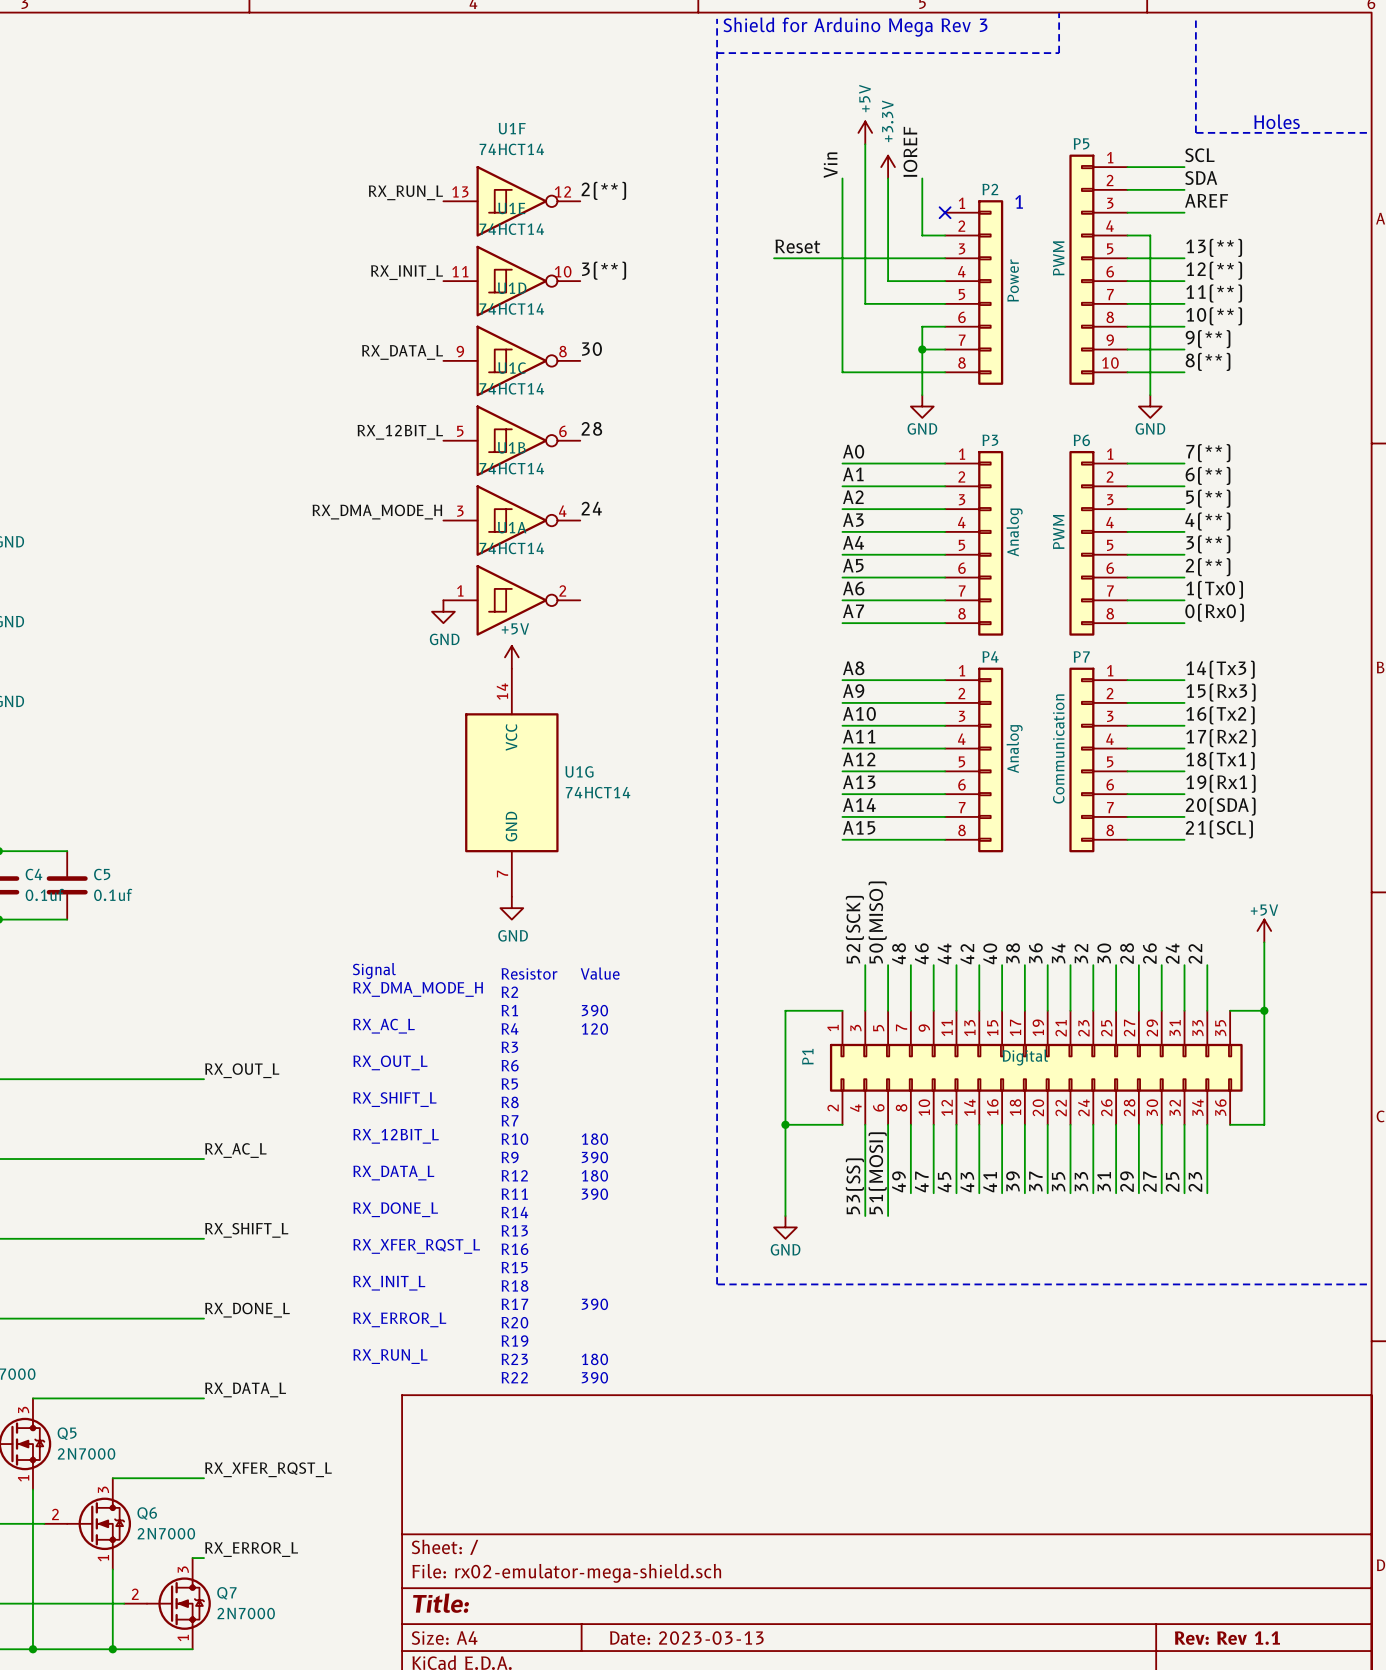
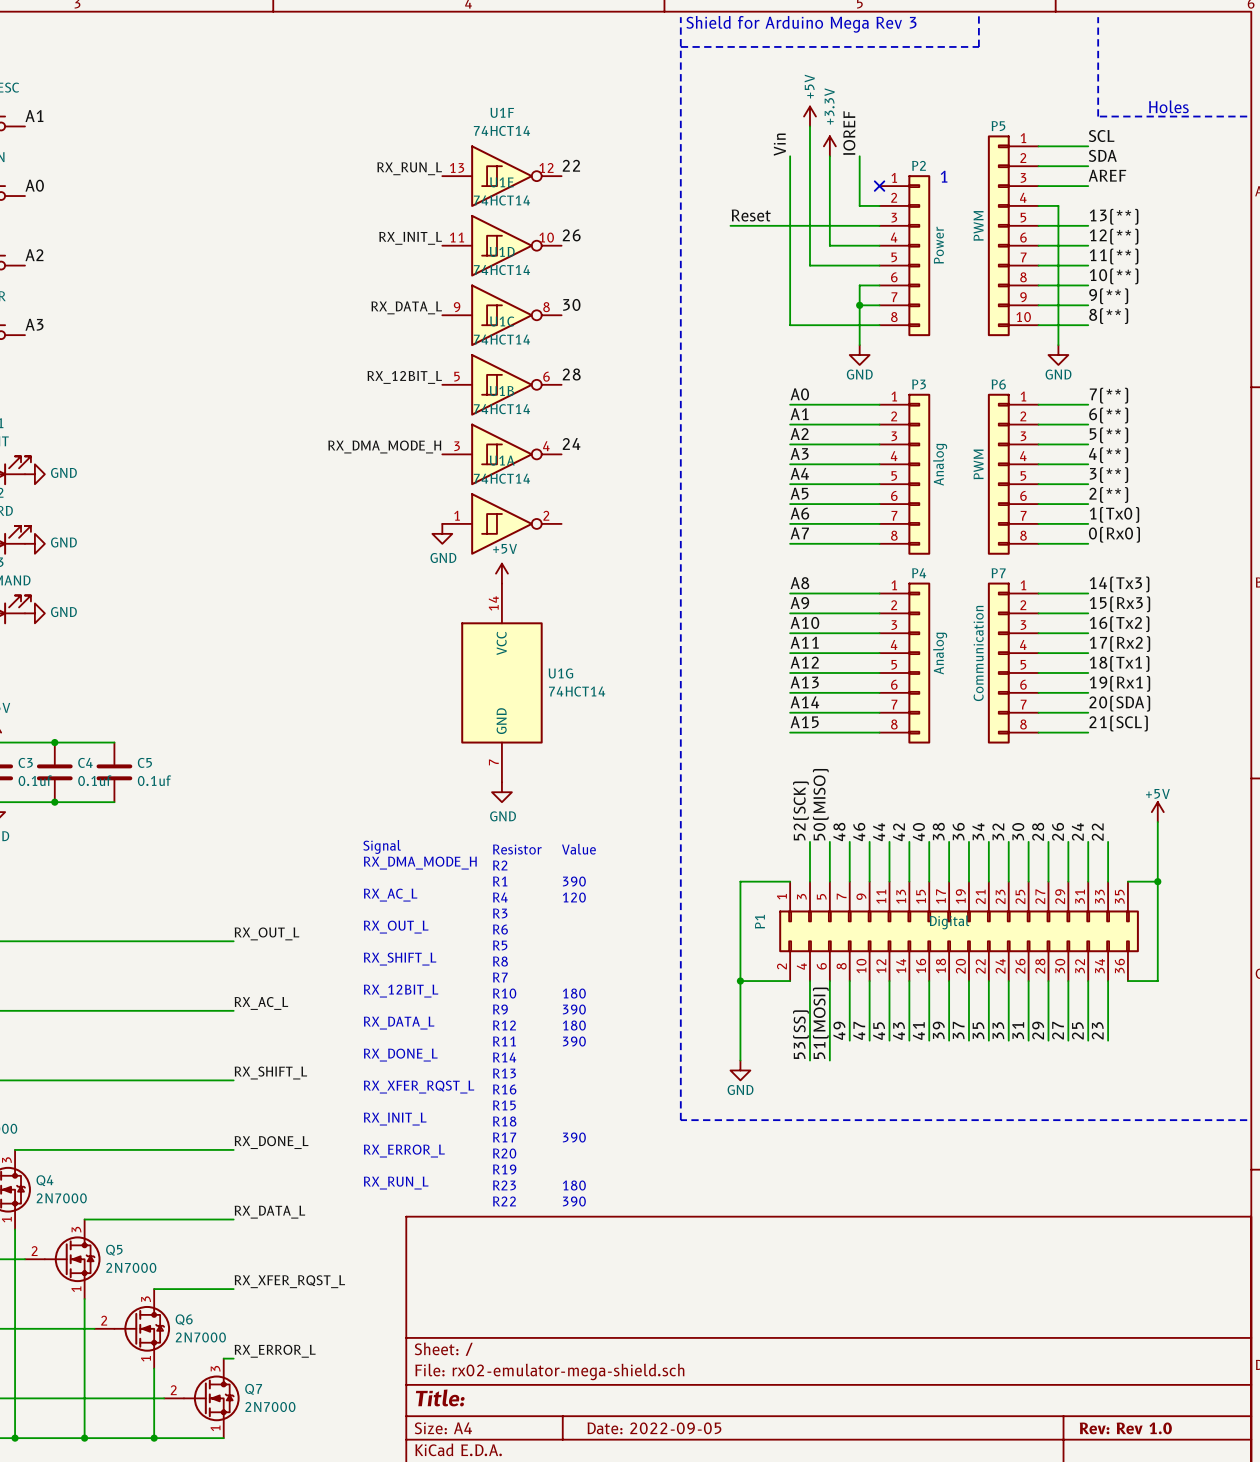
label: 2(**) (603, 190) -> 22 (571, 165)
label: 3(**) (604, 270) -> 26 (571, 235)
title block: Date: 2023-03-13 (686, 1638) -> Date: 2022-09-05 (654, 1428)
title block: Rev: Rev 1.1 (1227, 1638) -> Rev: Rev 1.0 (1125, 1428)

